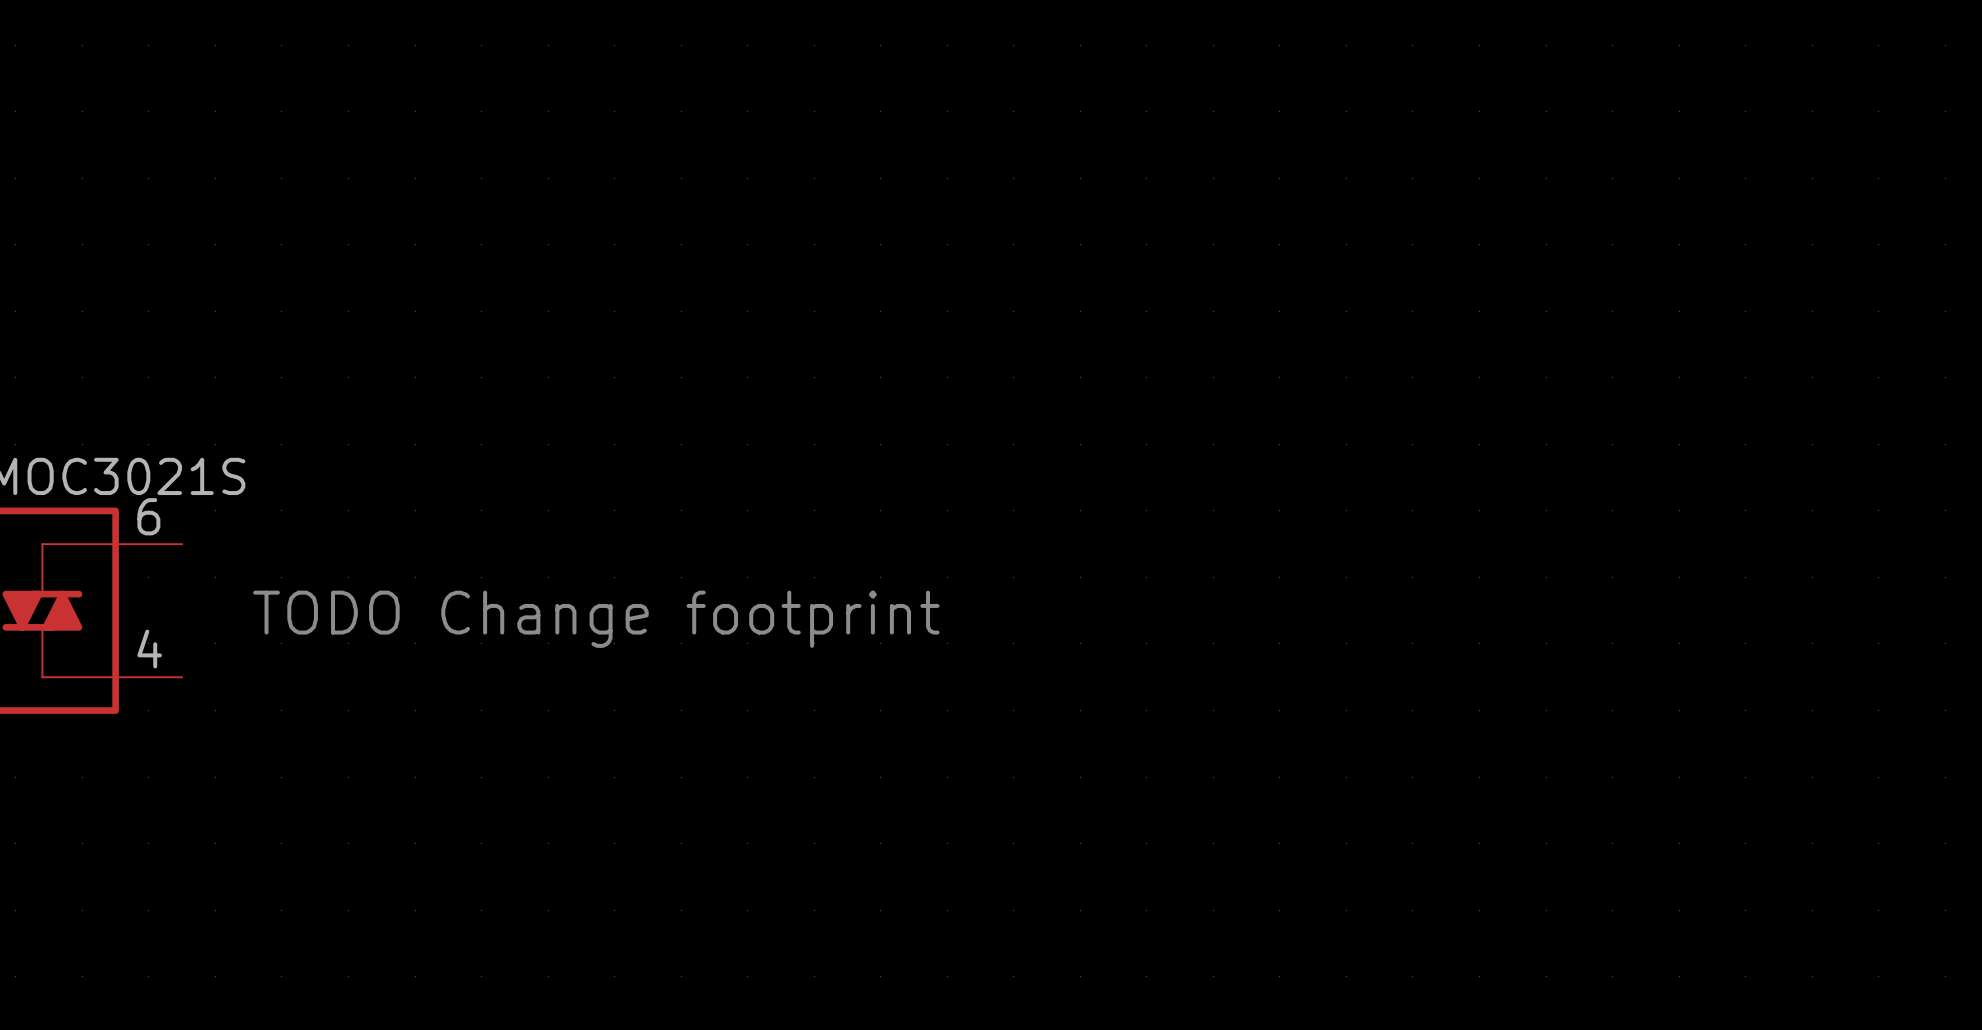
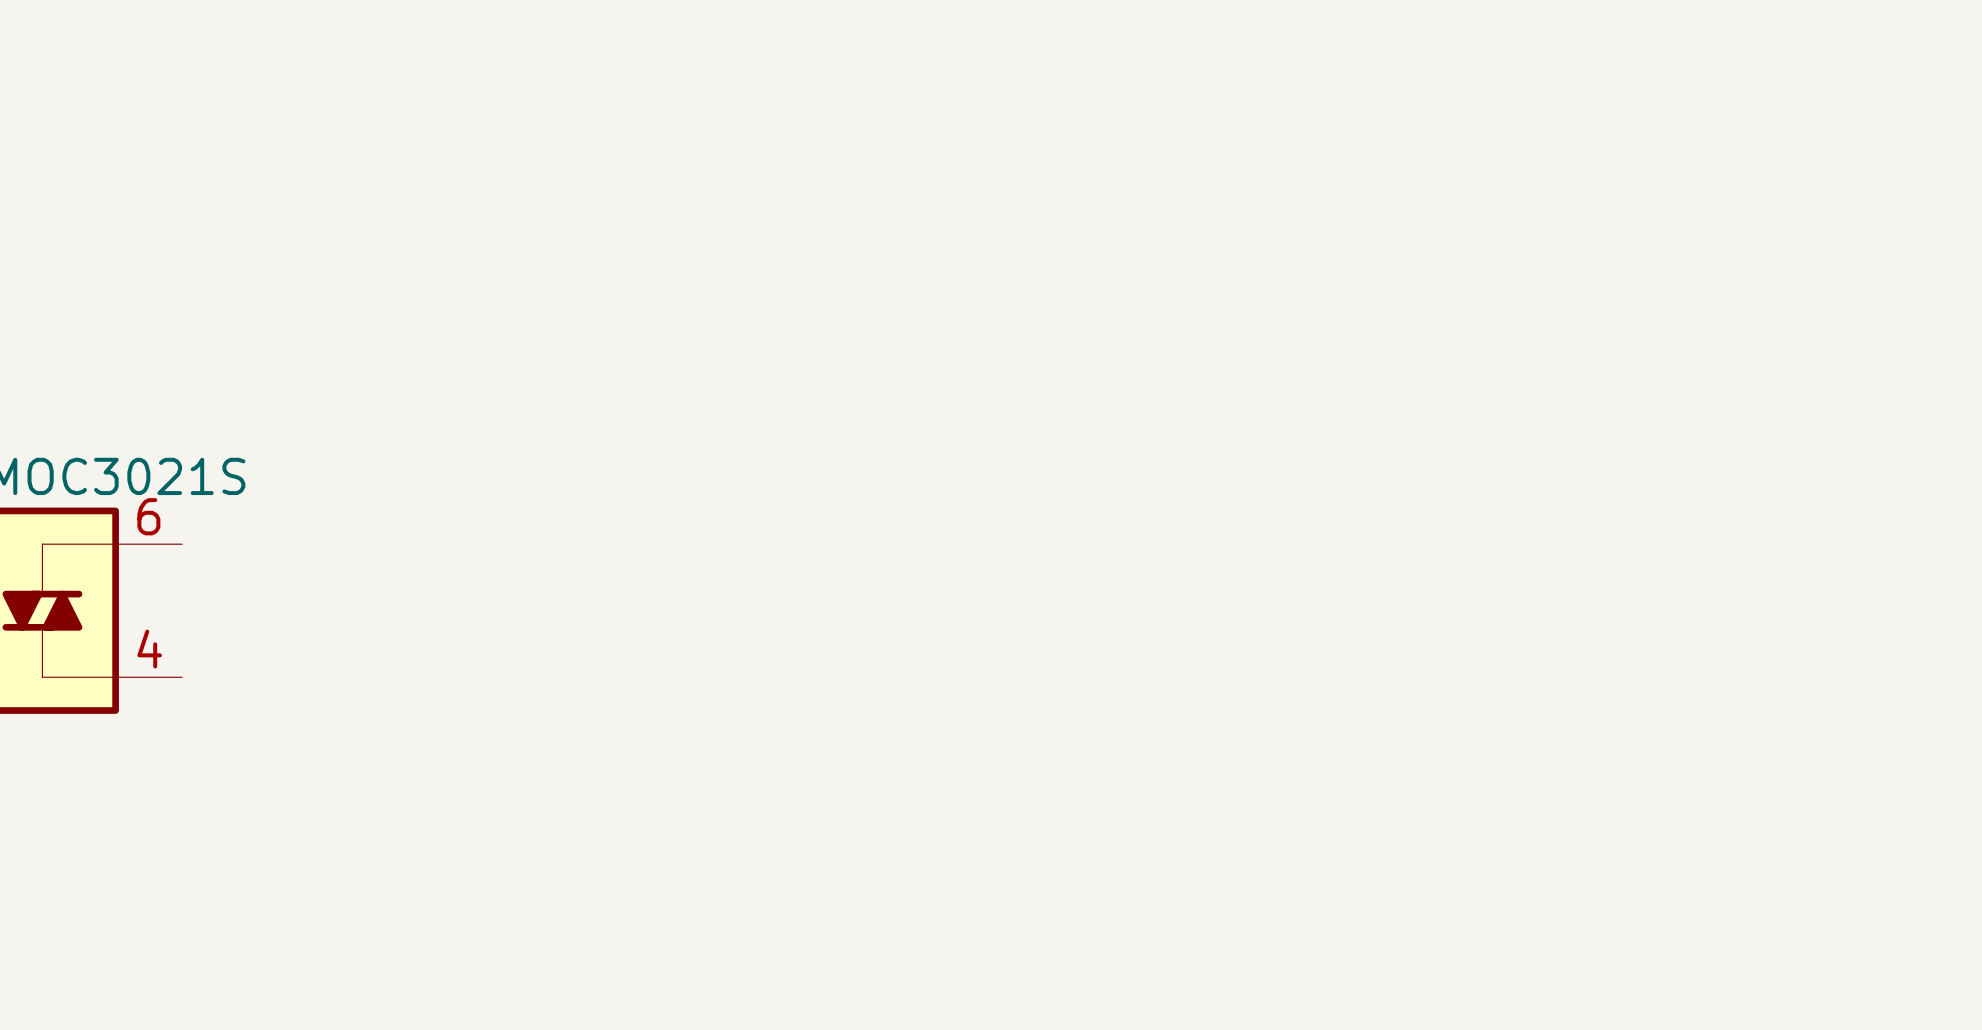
text: TODO Change footprint (596, 619) -> none

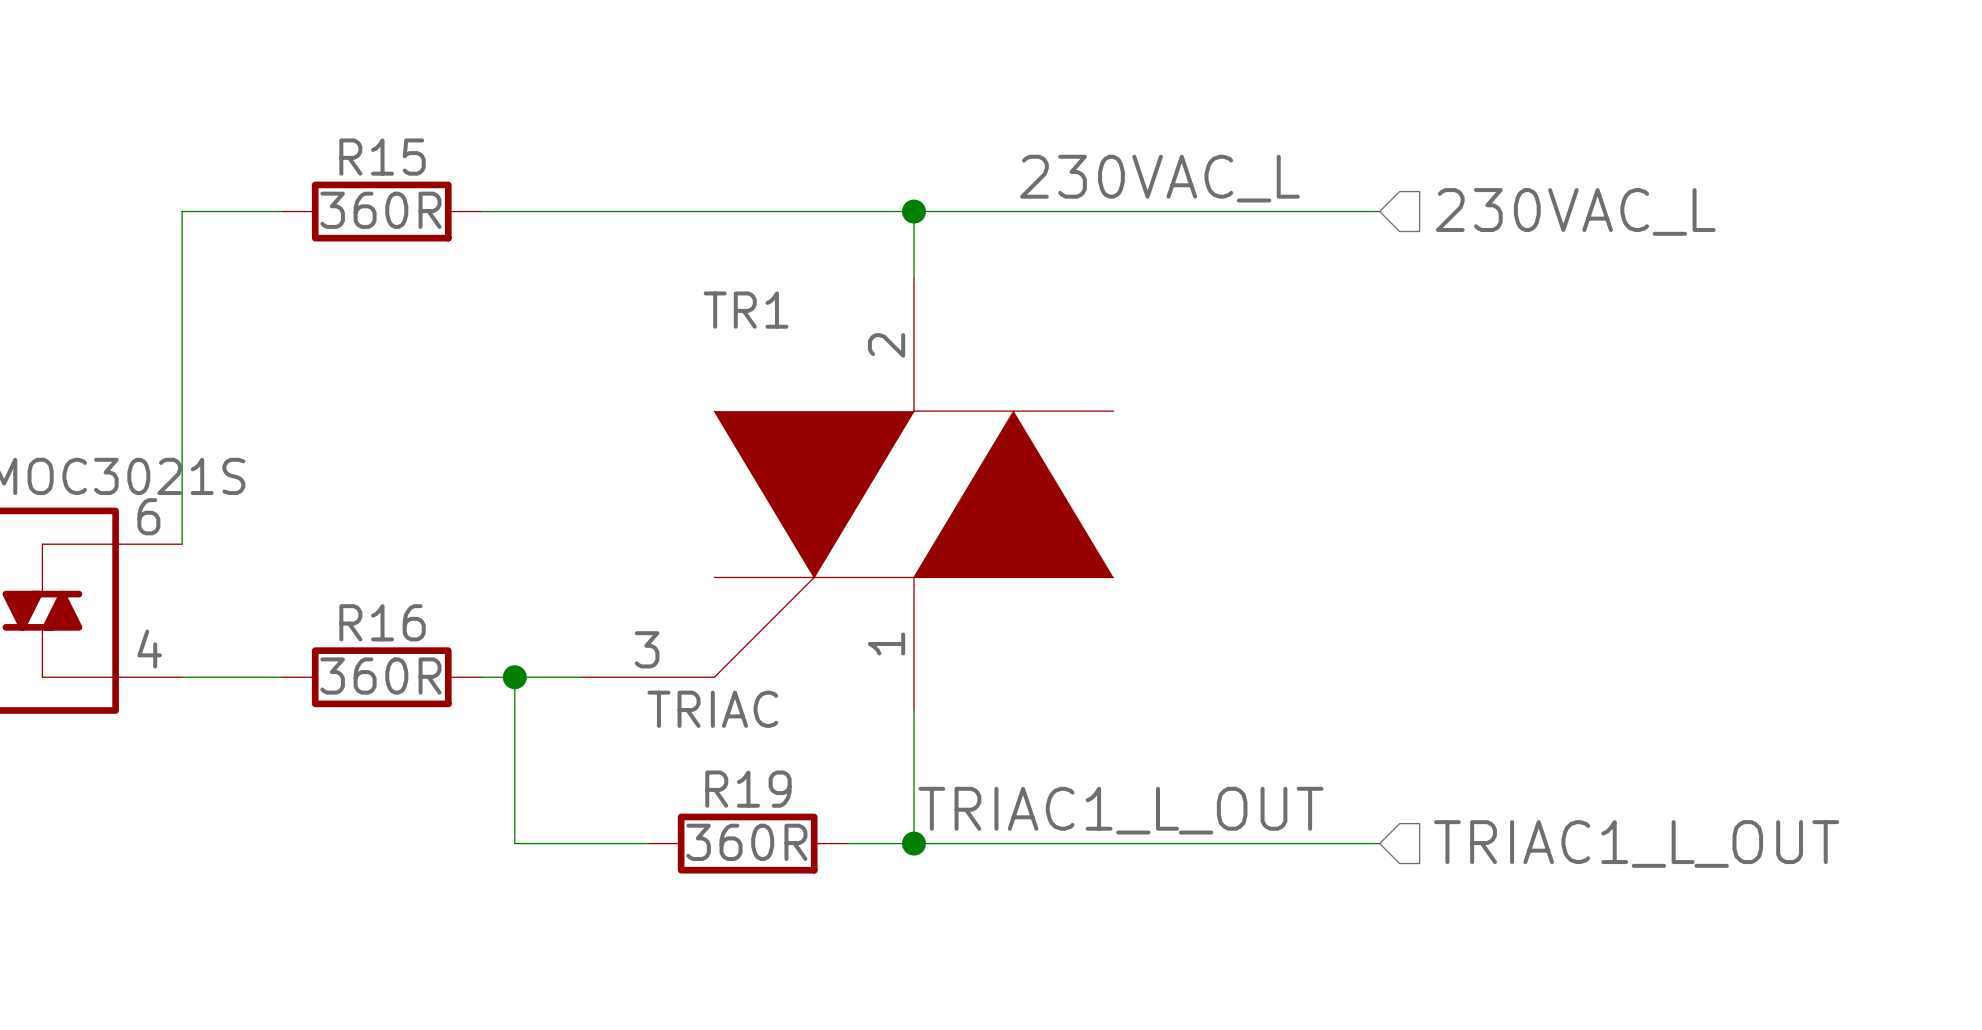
label: none -> 230VAC_L (1159, 178)
wire: none -> (281, 211) (182, 211) (182, 544)
R15: none -> 360R (381, 211)
wire: none -> (481, 211) (1379, 211)
wire: none -> (913, 211) (913, 278)
junction: none -> (913, 211)
hierarchical label: none -> 230VAC_L (1575, 211)
TR1: none -> TRIAC (847, 494)
wire: none -> (182, 677) (281, 677)
R16: none -> 360R (381, 677)
wire: none -> (481, 677) (581, 677)
wire: none -> (514, 677) (514, 843) (647, 843)
junction: none -> (514, 677)
wire: none -> (913, 710) (913, 843)
label: none -> TRIAC1_L_OUT (1120, 810)
R19: none -> 360R (747, 843)
wire: none -> (847, 843) (1379, 843)
junction: none -> (913, 843)
hierarchical label: none -> TRIAC1_L_OUT (1636, 843)

